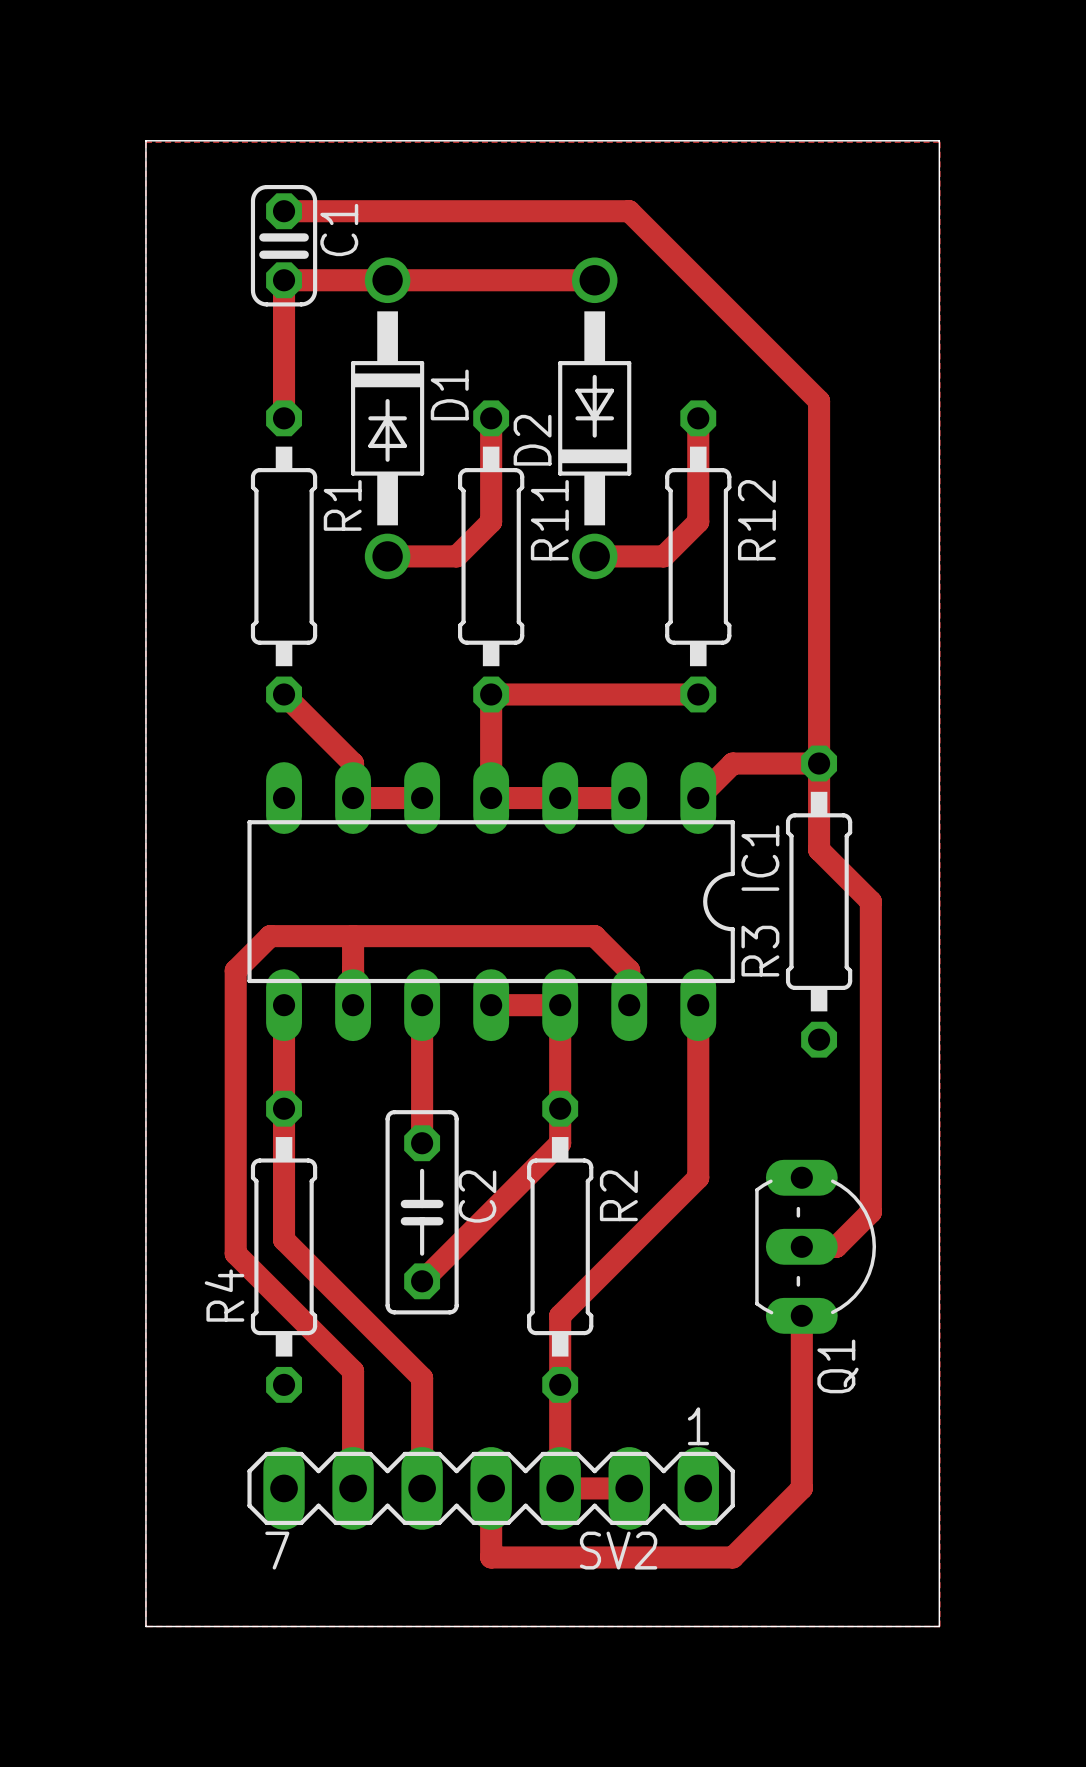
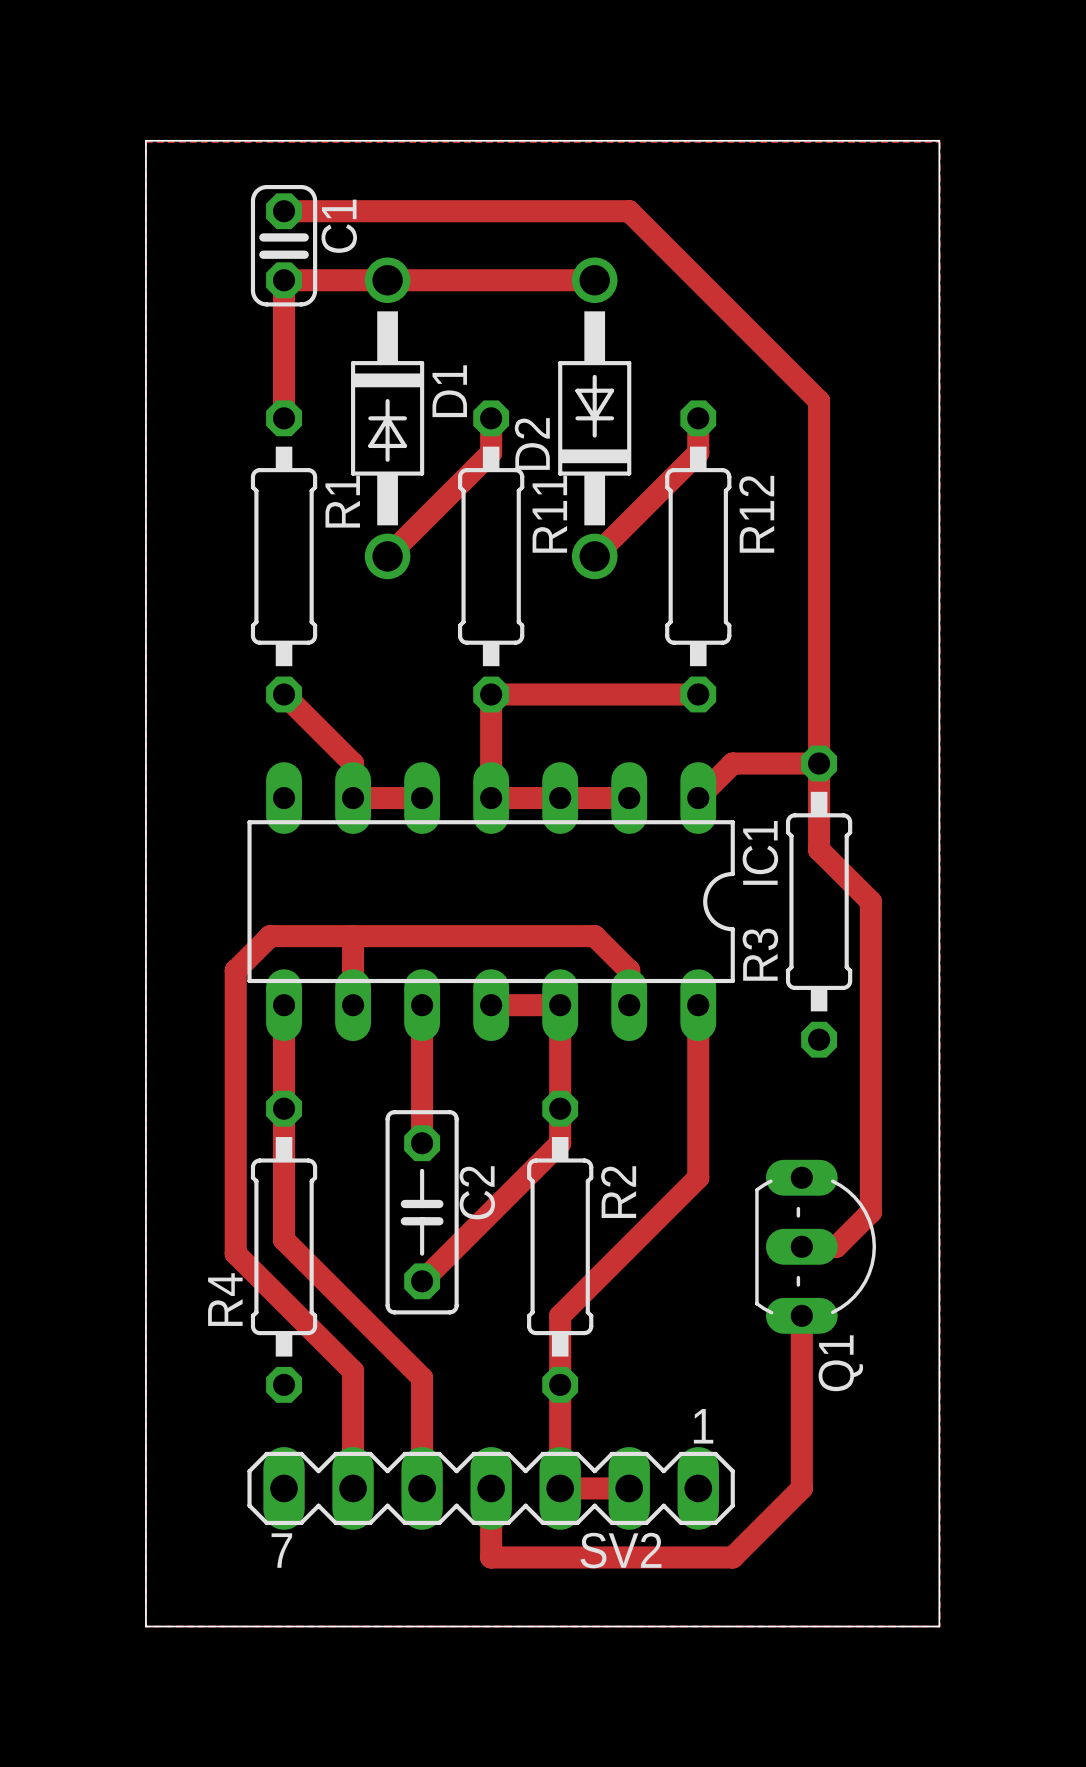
top track: (491, 452) (491, 521) (456, 556) (387, 556) -> (491, 452) (387, 556)
top track: (698, 452) (698, 521) (663, 556) (594, 556) -> (698, 452) (594, 556)

